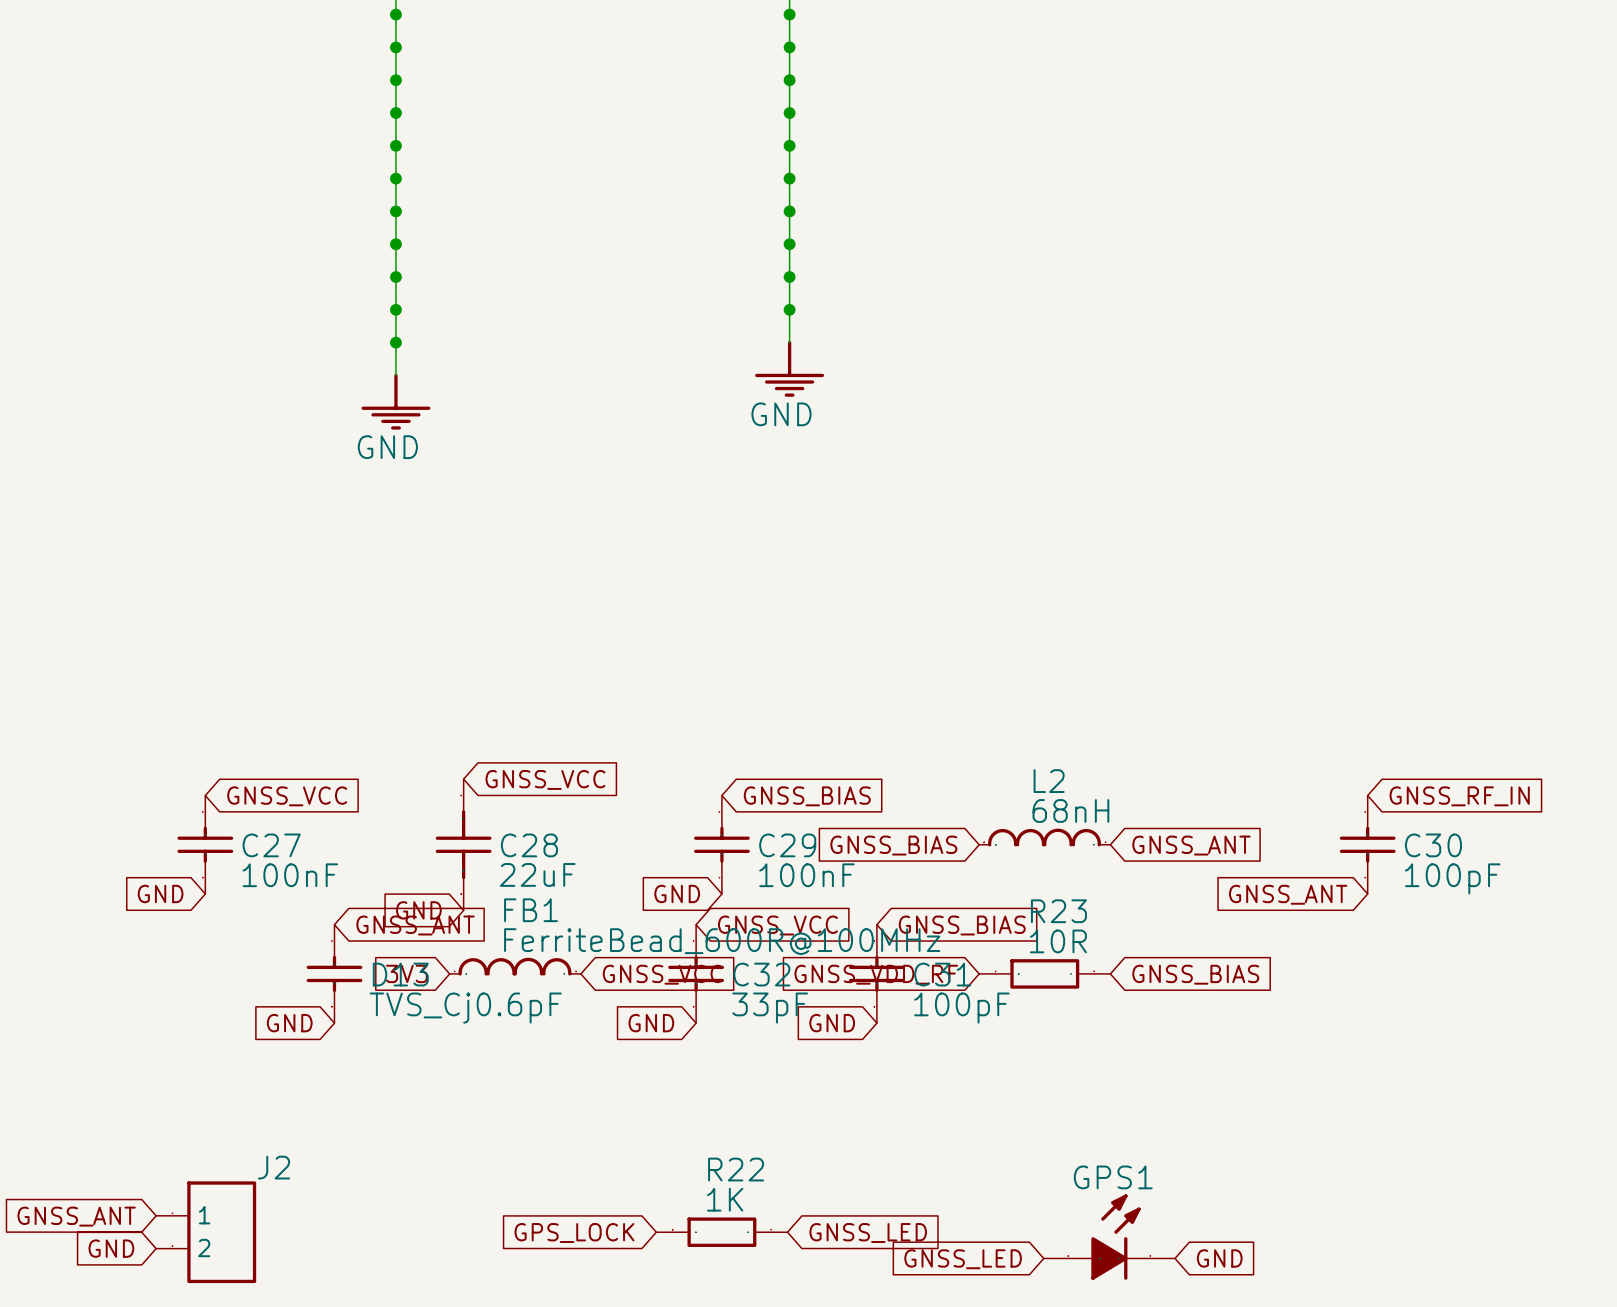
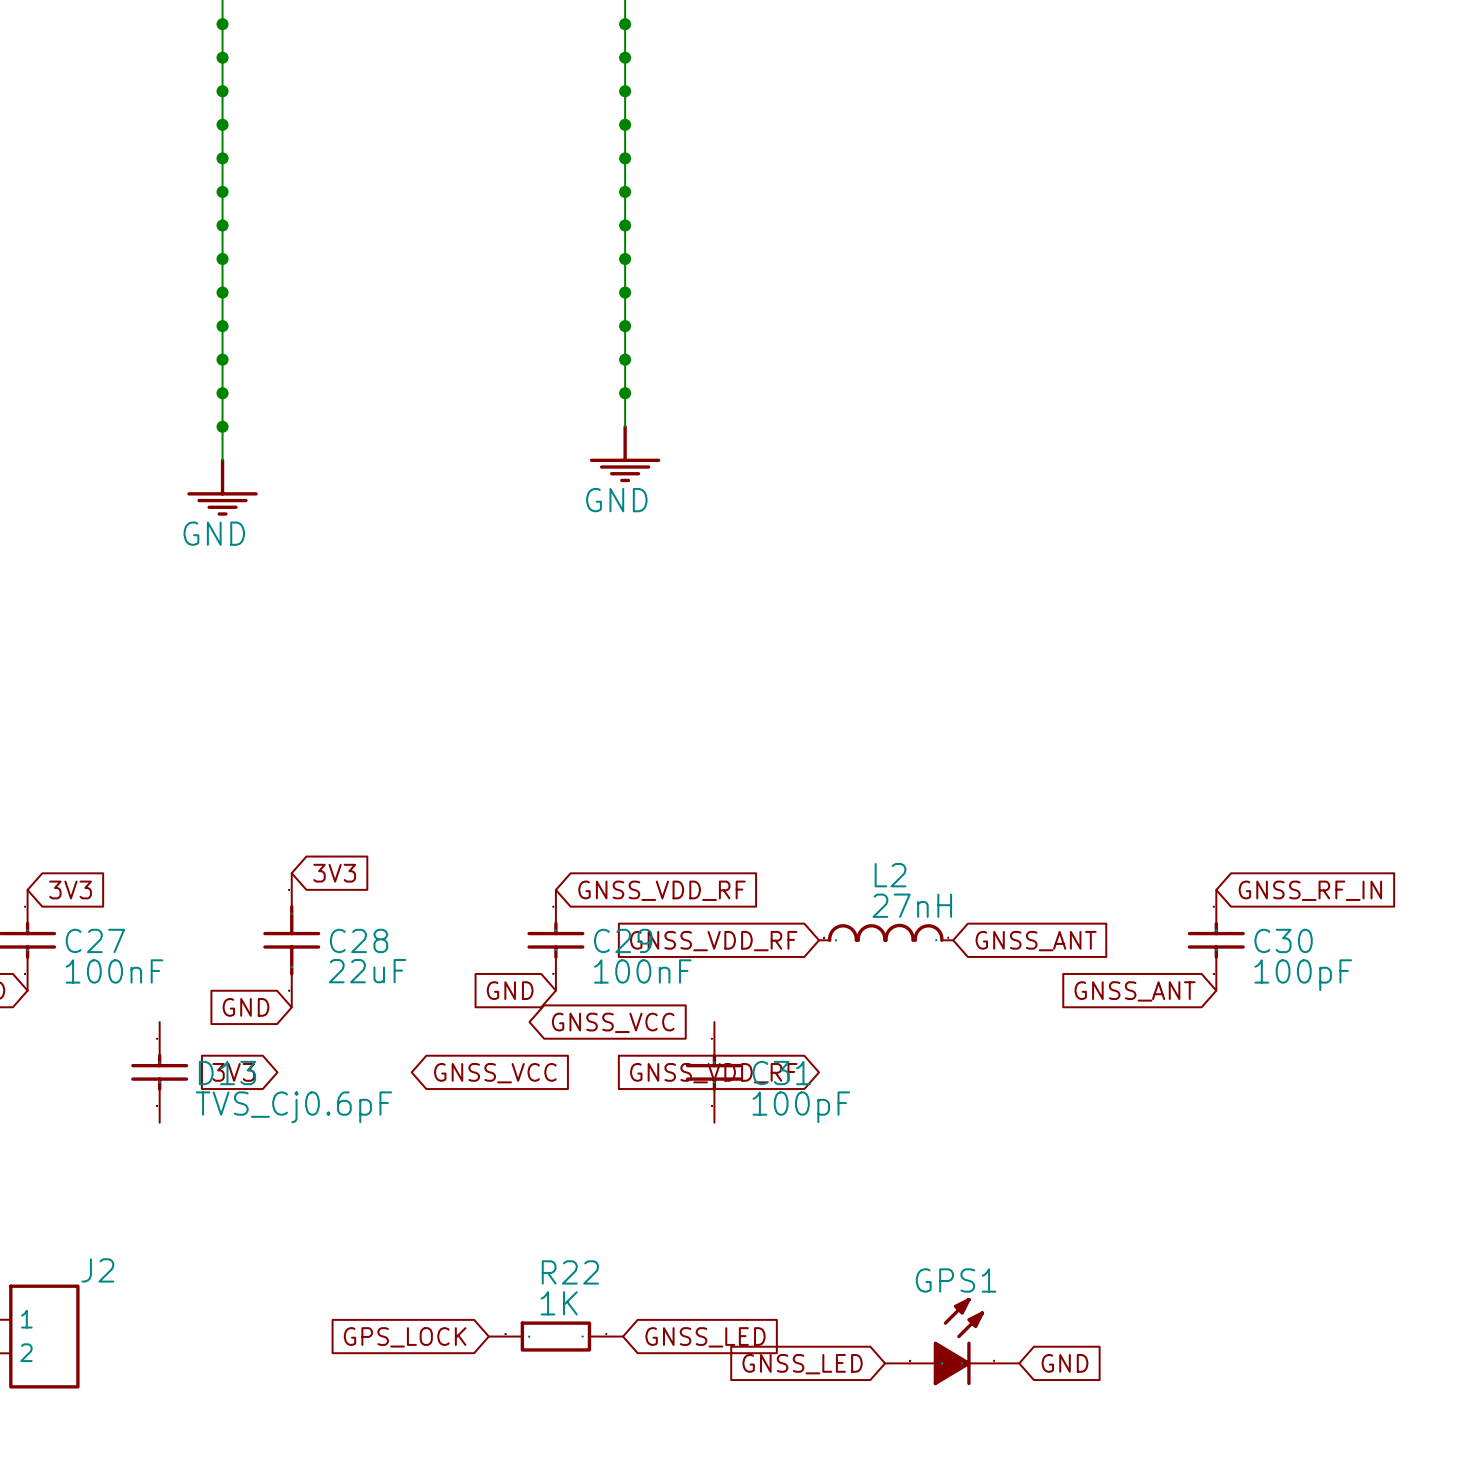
global label: GNSS_VCC (545, 779) -> 3V3 (334, 873)
global label: GNSS_VCC (287, 796) -> 3V3 (70, 889)
global label: GNSS_BIAS (807, 796) -> GNSS_VDD_RF (661, 890)
L2 value: 68nH (1070, 810) -> 27nH (912, 905)
global label: GNSS_BIAS (893, 845) -> GNSS_VDD_RF (713, 941)
global label: GNSS_ANT (415, 925) -> none
global label: GNSS_BIAS (962, 925) -> none
FB1: FerriteBead_600R@100MHz (515, 966) -> none
C32: 33pF (696, 973) -> none
R23: 10R (1044, 973) -> none
global label: GNSS_BIAS (1195, 974) -> none
global label: GND (289, 1023) -> none
global label: GND (651, 1023) -> none
global label: GND (832, 1023) -> none

